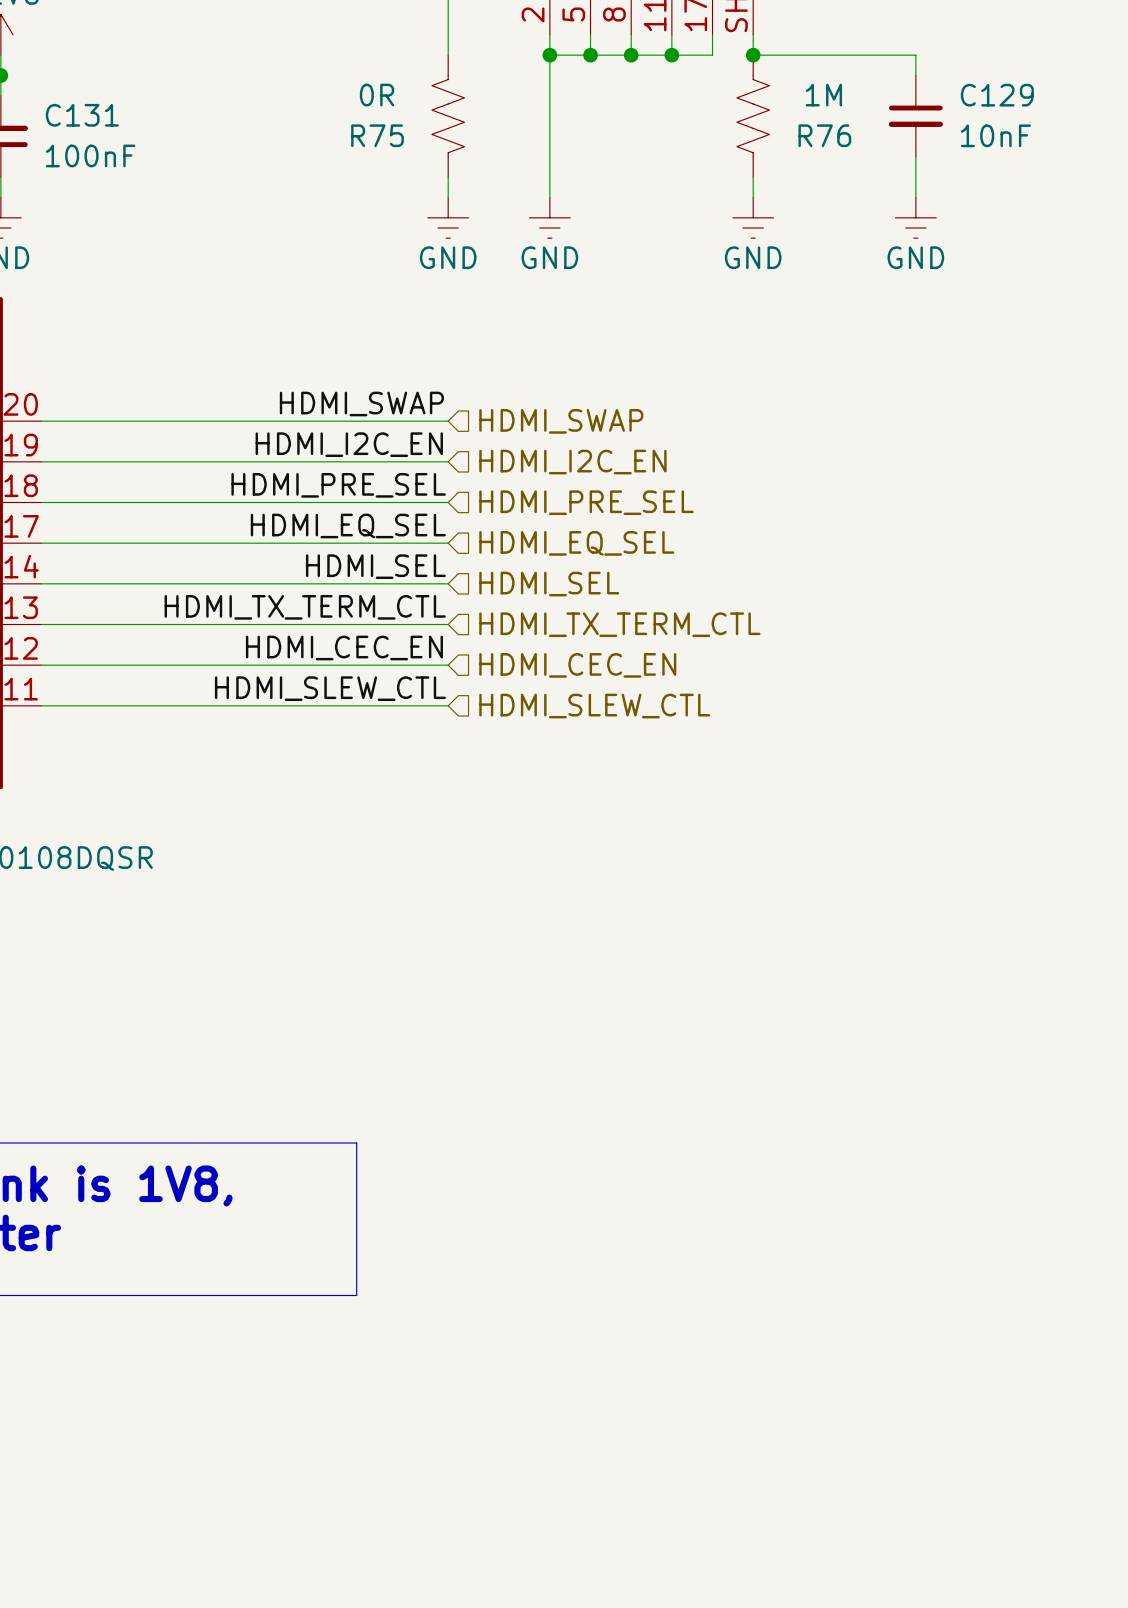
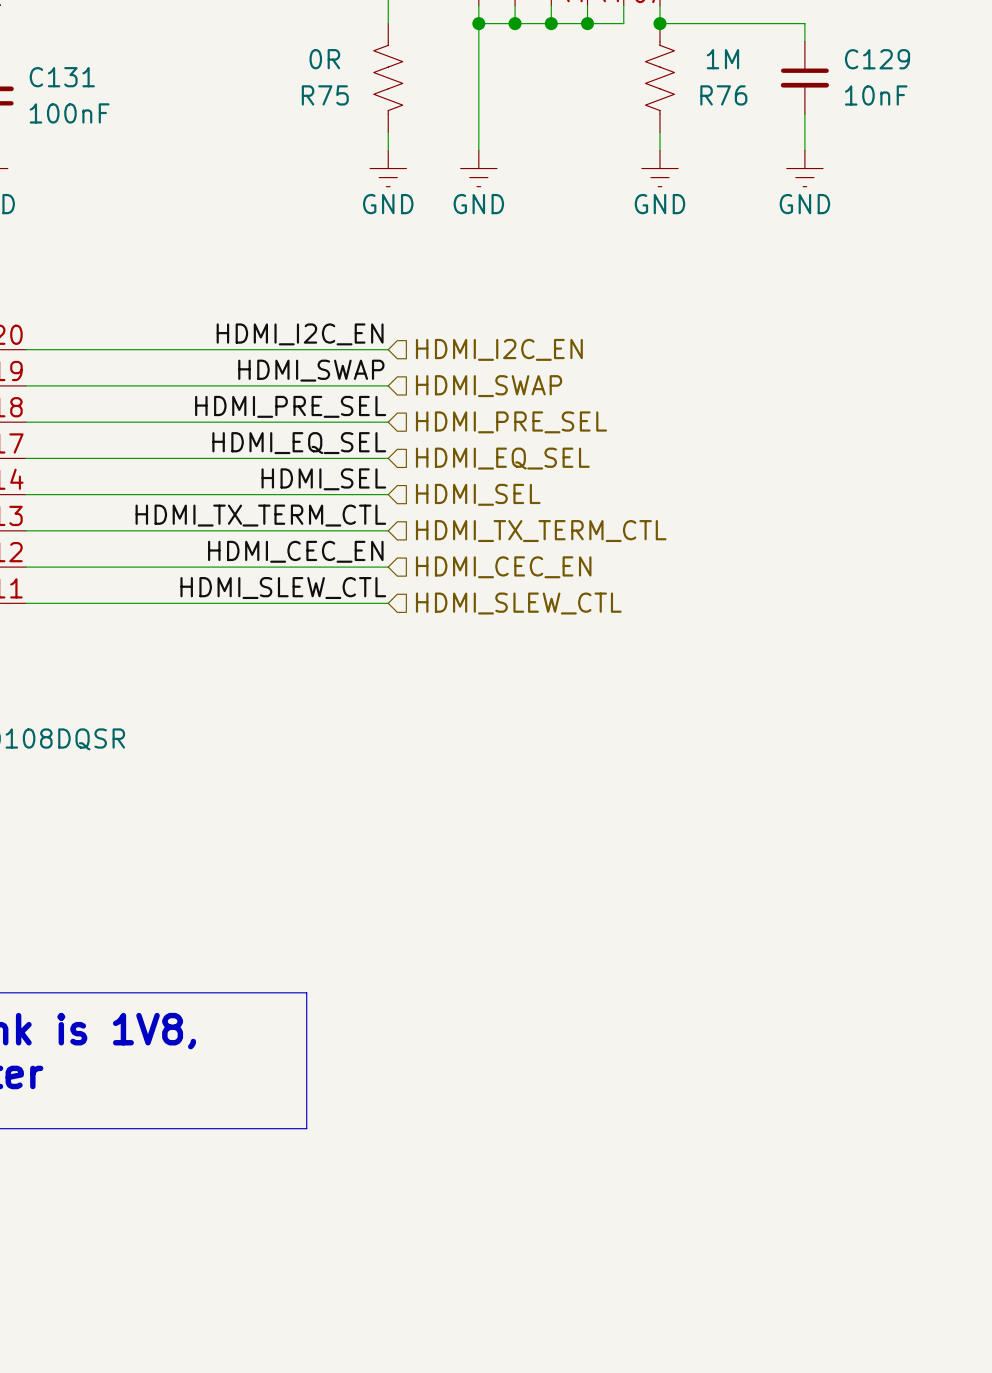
label: HDMI_SWAP (361, 403) -> HDMI_I2C_EN (300, 334)
hierarchical label: HDMI_SWAP (561, 421) -> HDMI_I2C_EN (499, 349)
label: HDMI_I2C_EN (349, 444) -> HDMI_SWAP (311, 370)
hierarchical label: HDMI_I2C_EN (572, 462) -> HDMI_SWAP (489, 386)

